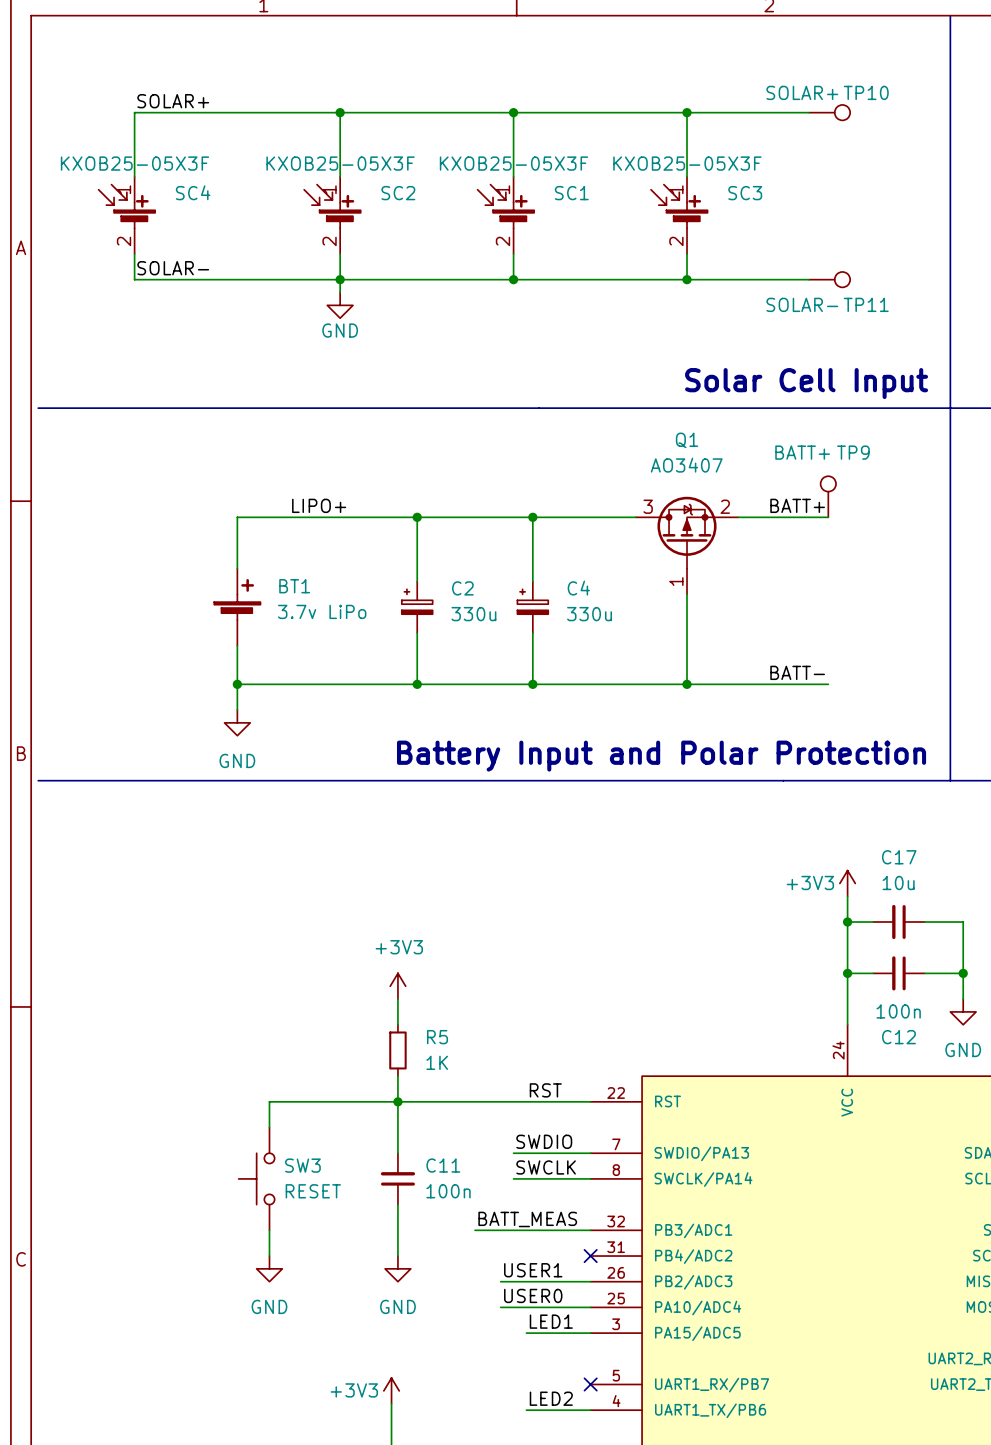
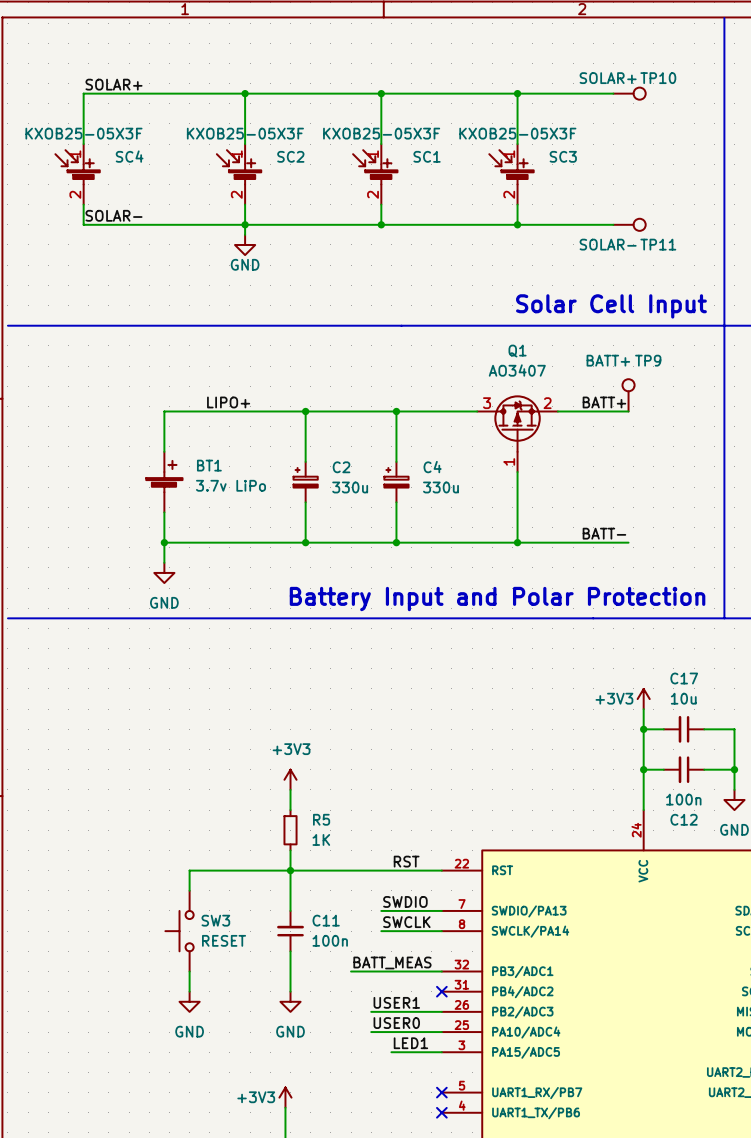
label: LED2 (551, 1398) -> none
wire: (526, 1410) (590, 1410) -> none
no-connect mark: none -> (441, 1112)

